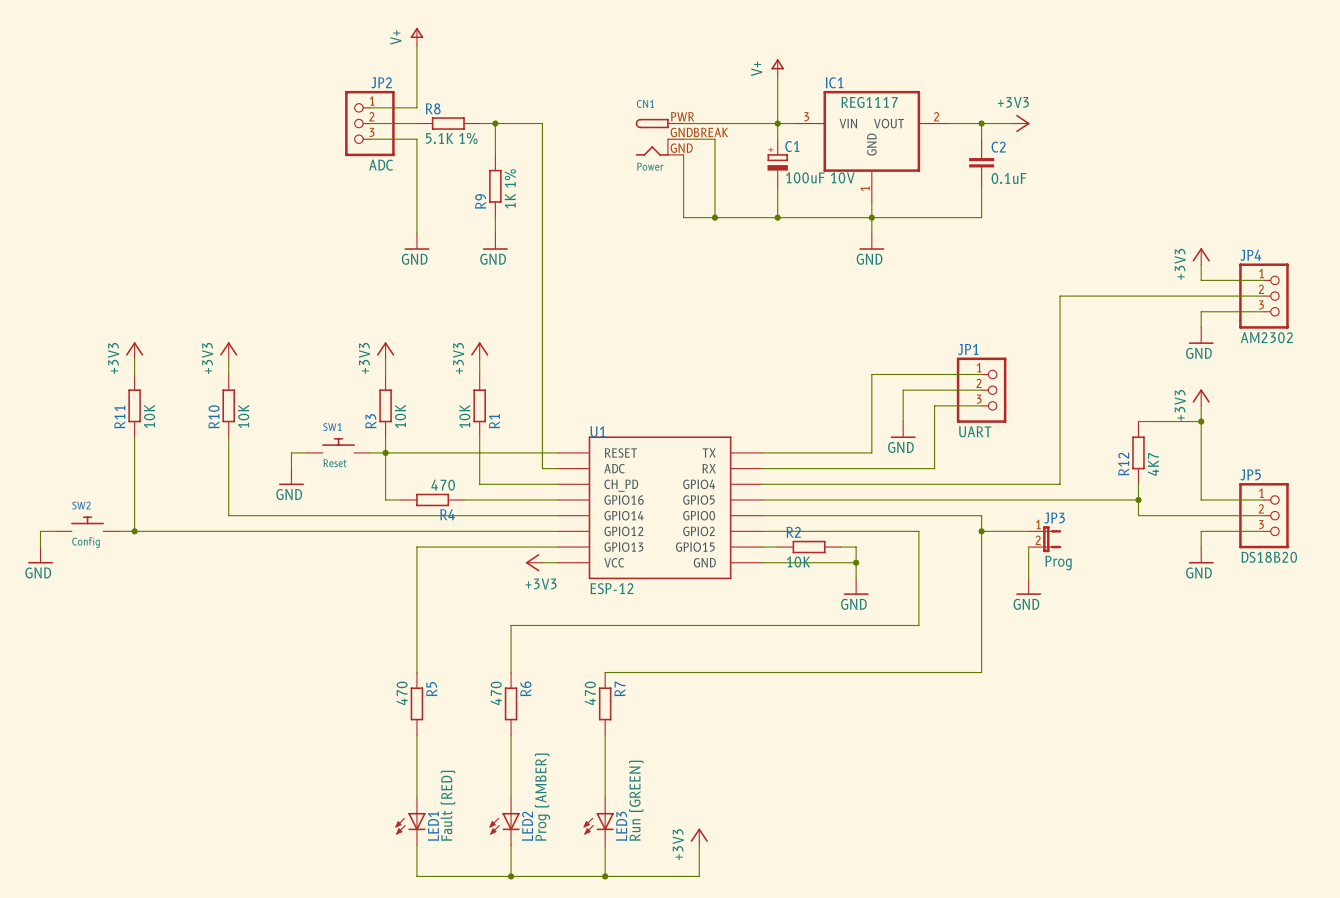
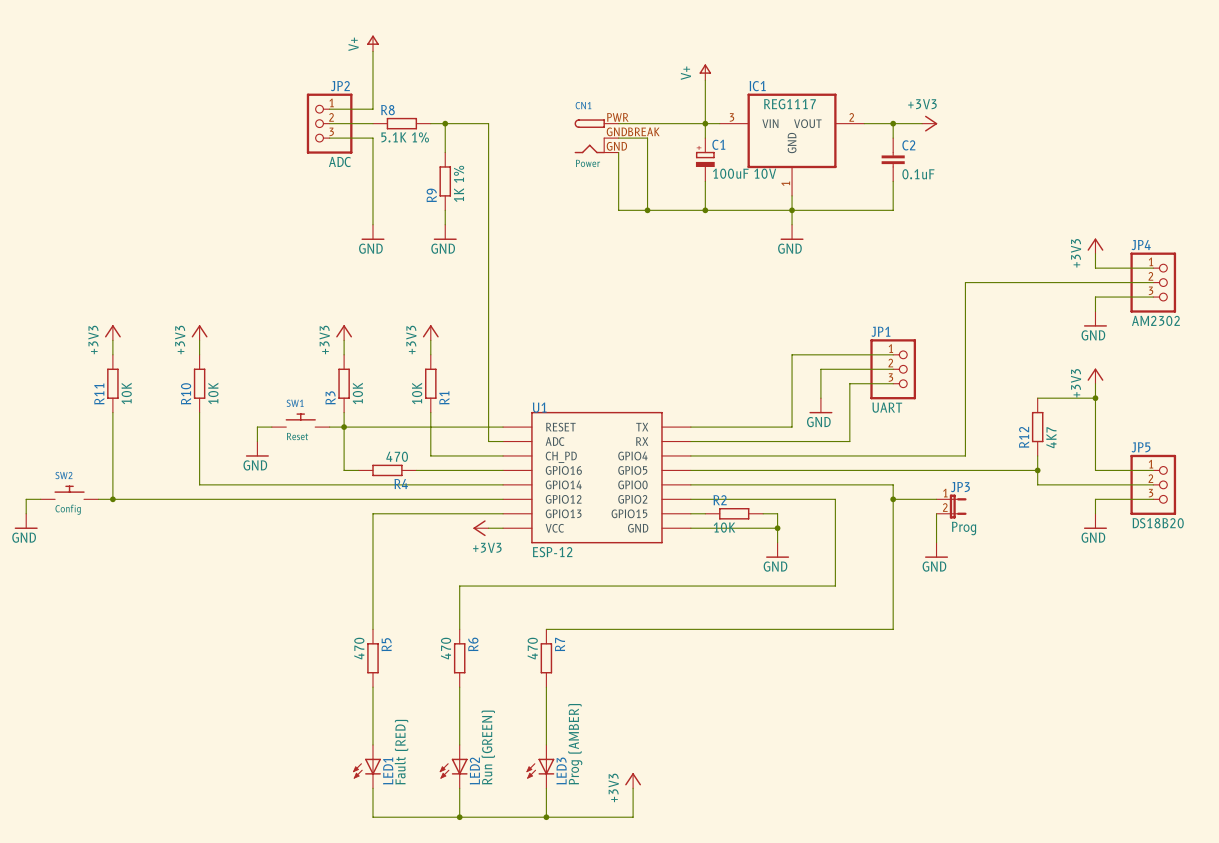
LED2 value: Prog (AMBER) (542, 797) -> Run (GREEN) (488, 747)
LED3 value: Run (GREEN) (636, 800) -> Prog (AMBER) (575, 744)

